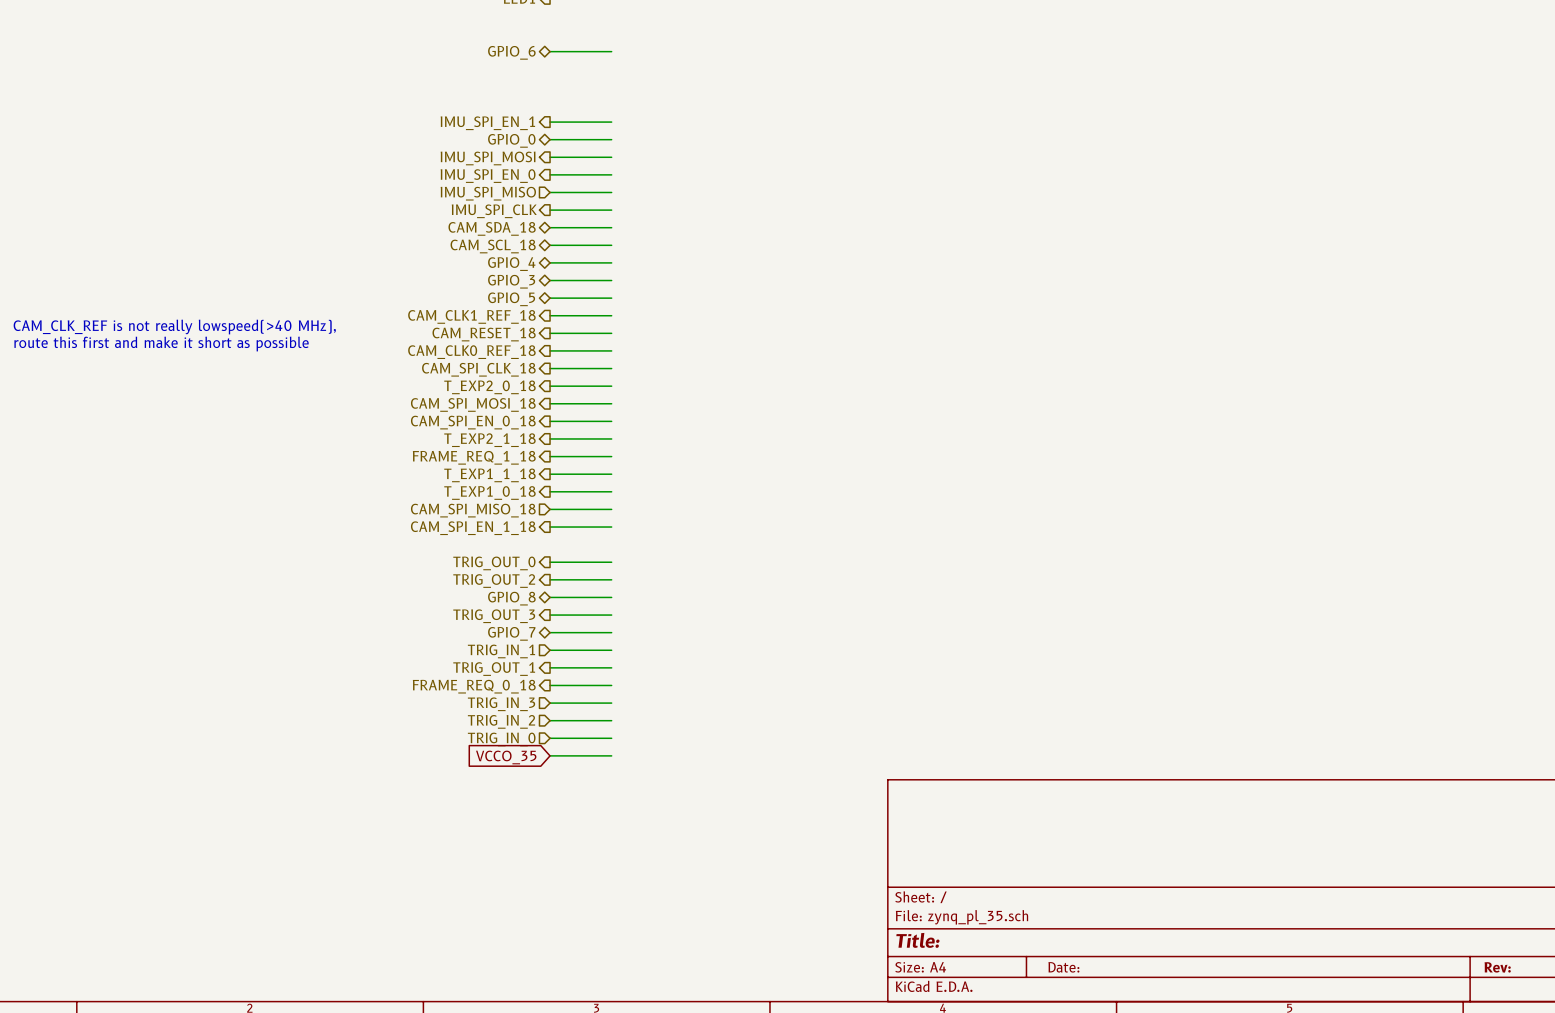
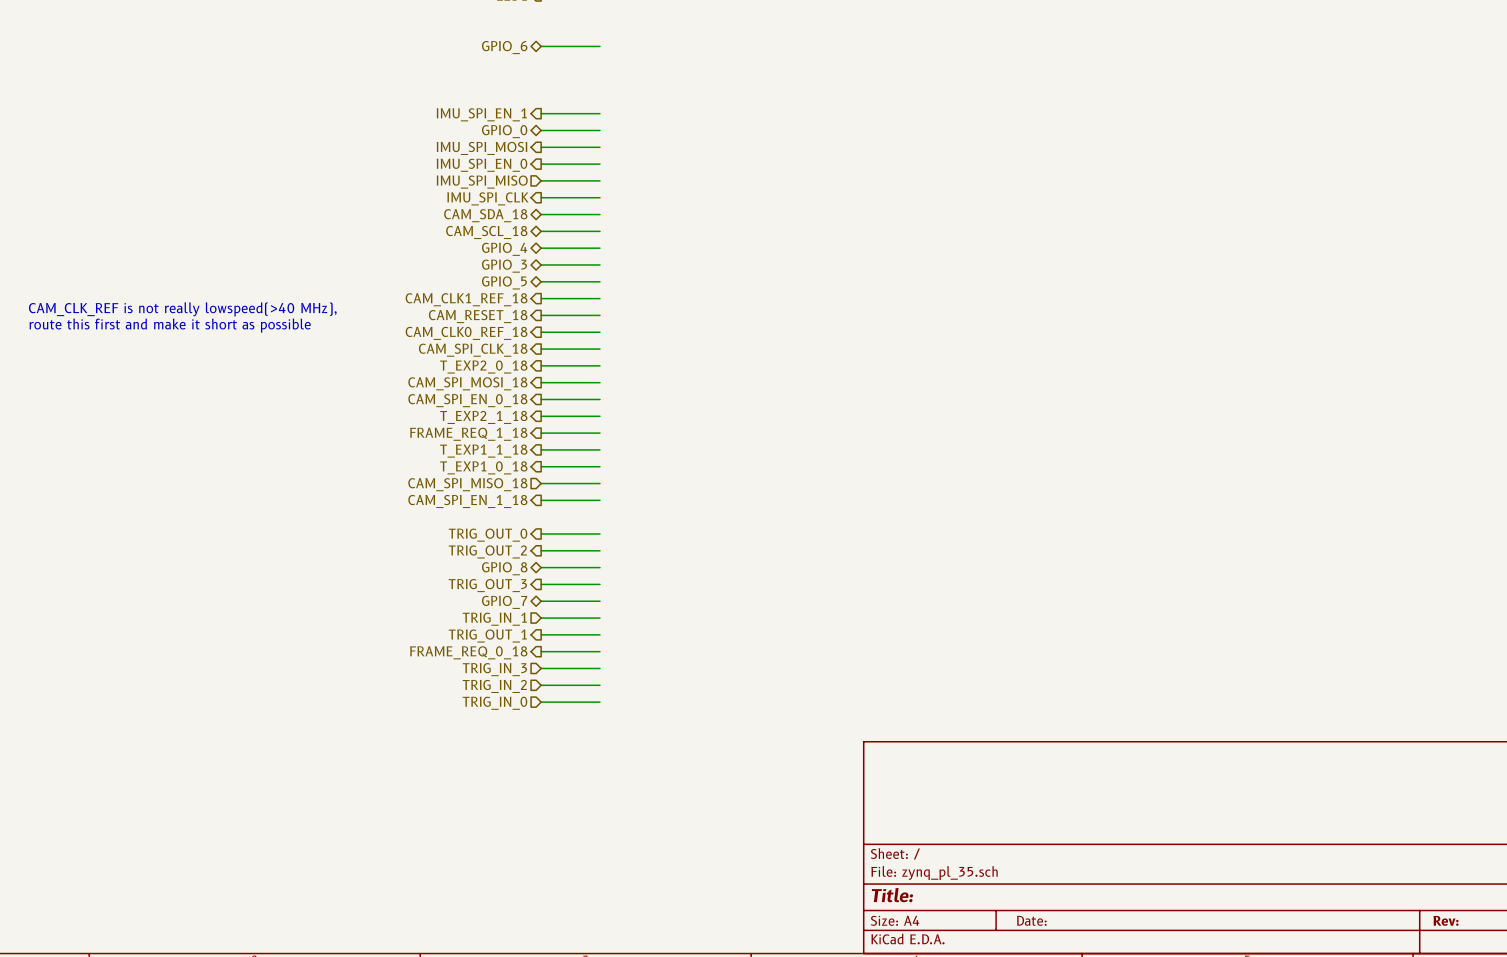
wire: (550, 755) (611, 755) -> none
global label: VCCO_35 (506, 757) -> none

